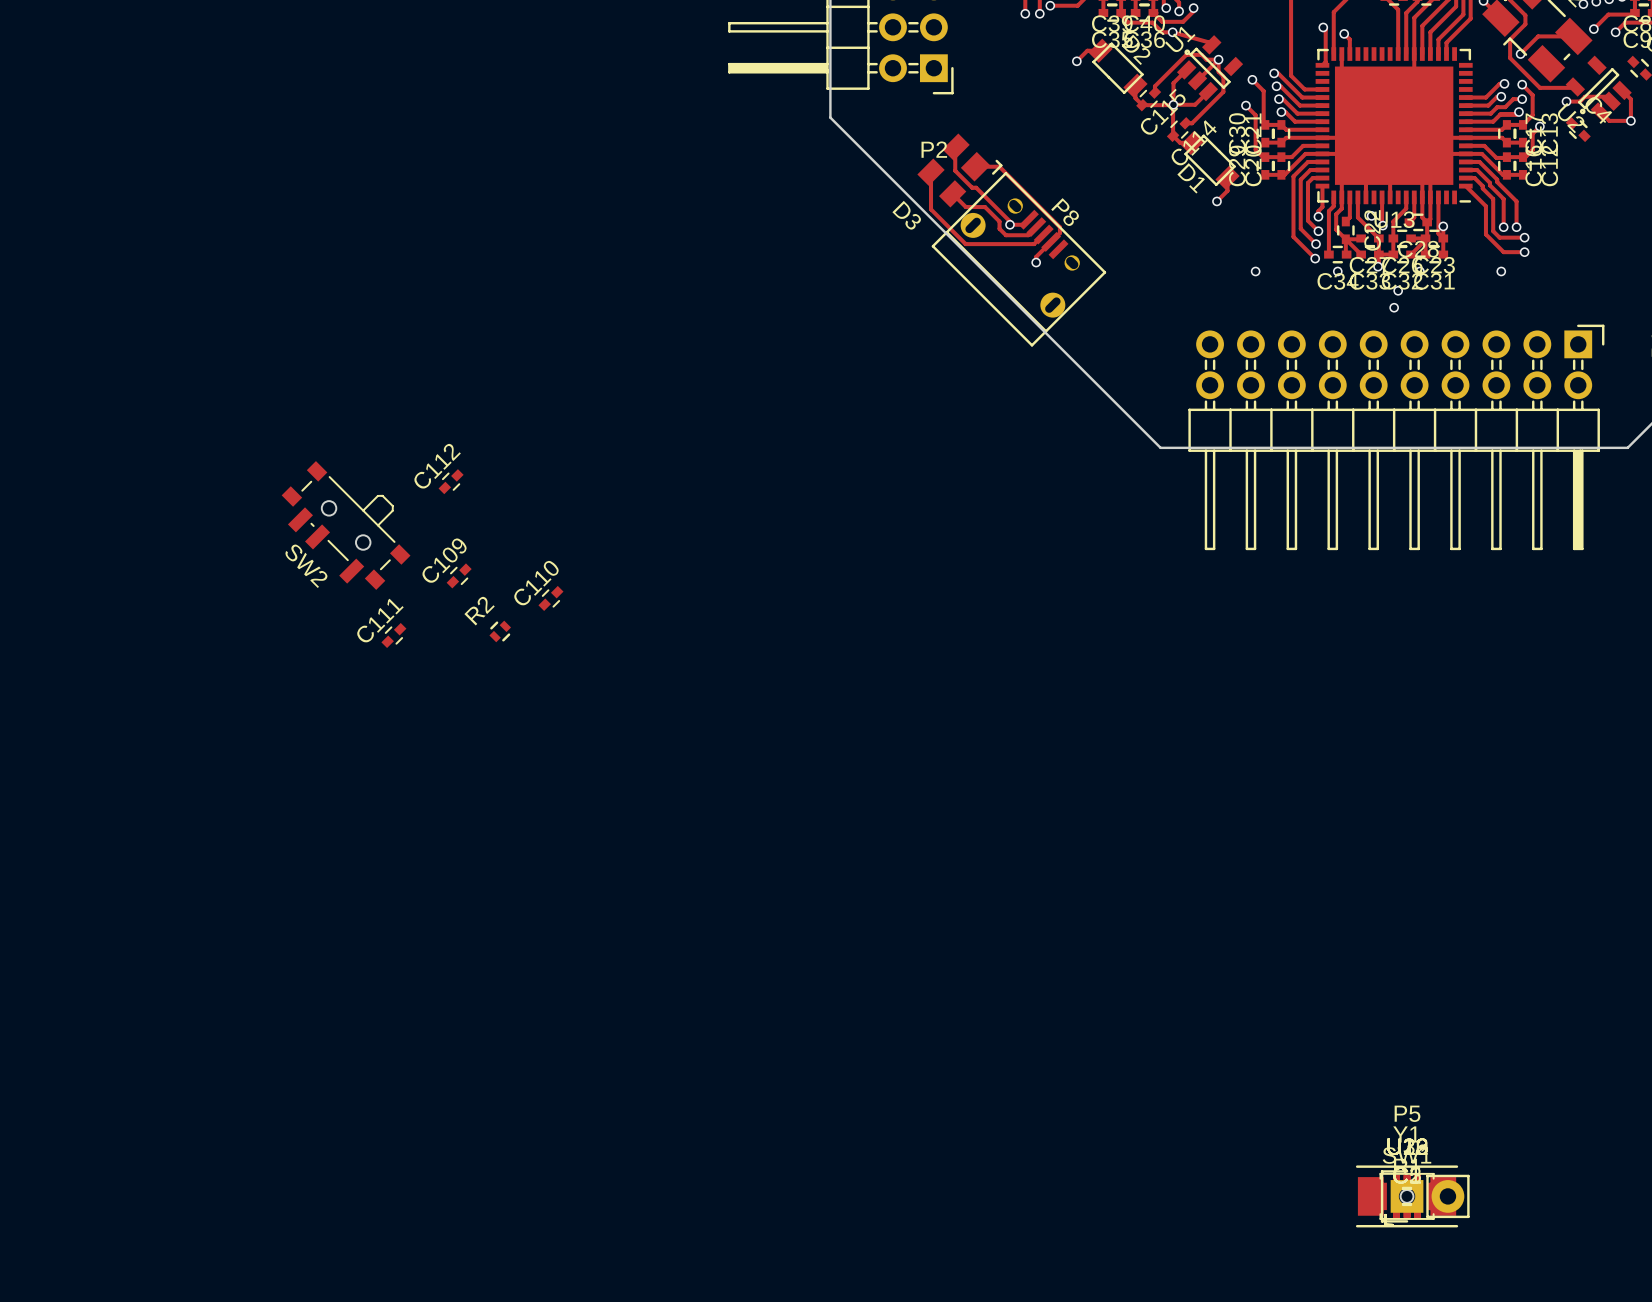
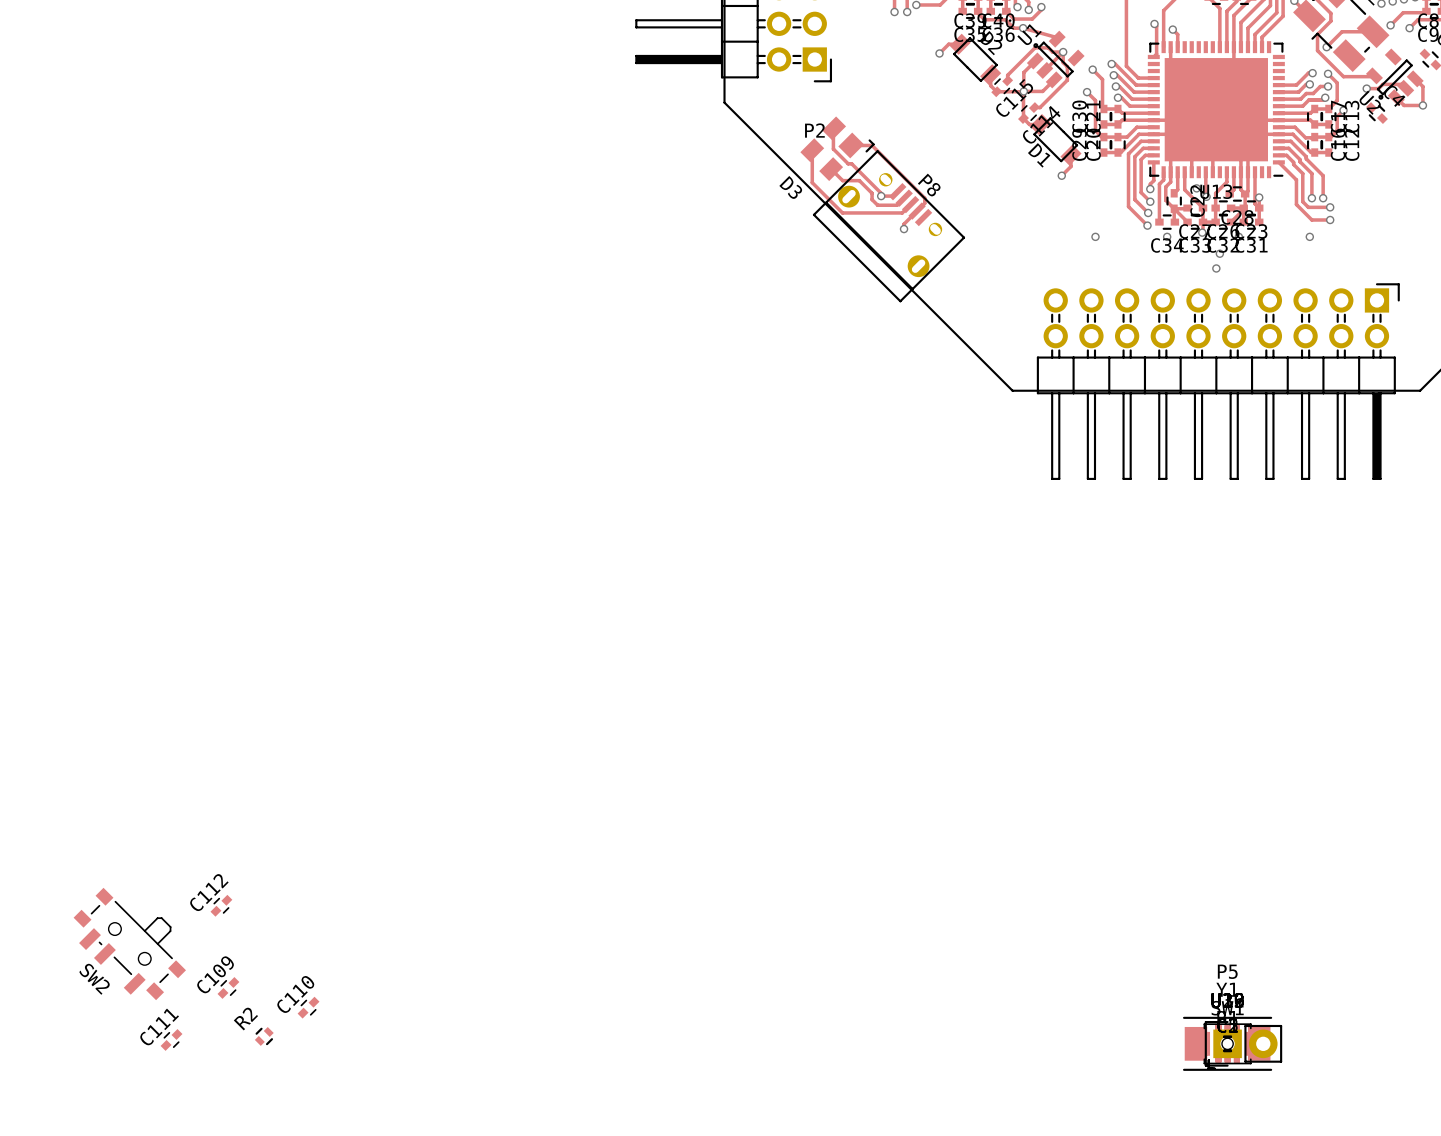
C112 position: (451, 481) -> (221, 905)
SW2 position: (346, 525) -> (129, 943)
C109 position: (459, 575) -> (228, 987)
C110 position: (550, 598) -> (308, 1007)
R2 position: (500, 631) -> (264, 1036)
C111 position: (393, 635) -> (171, 1039)

